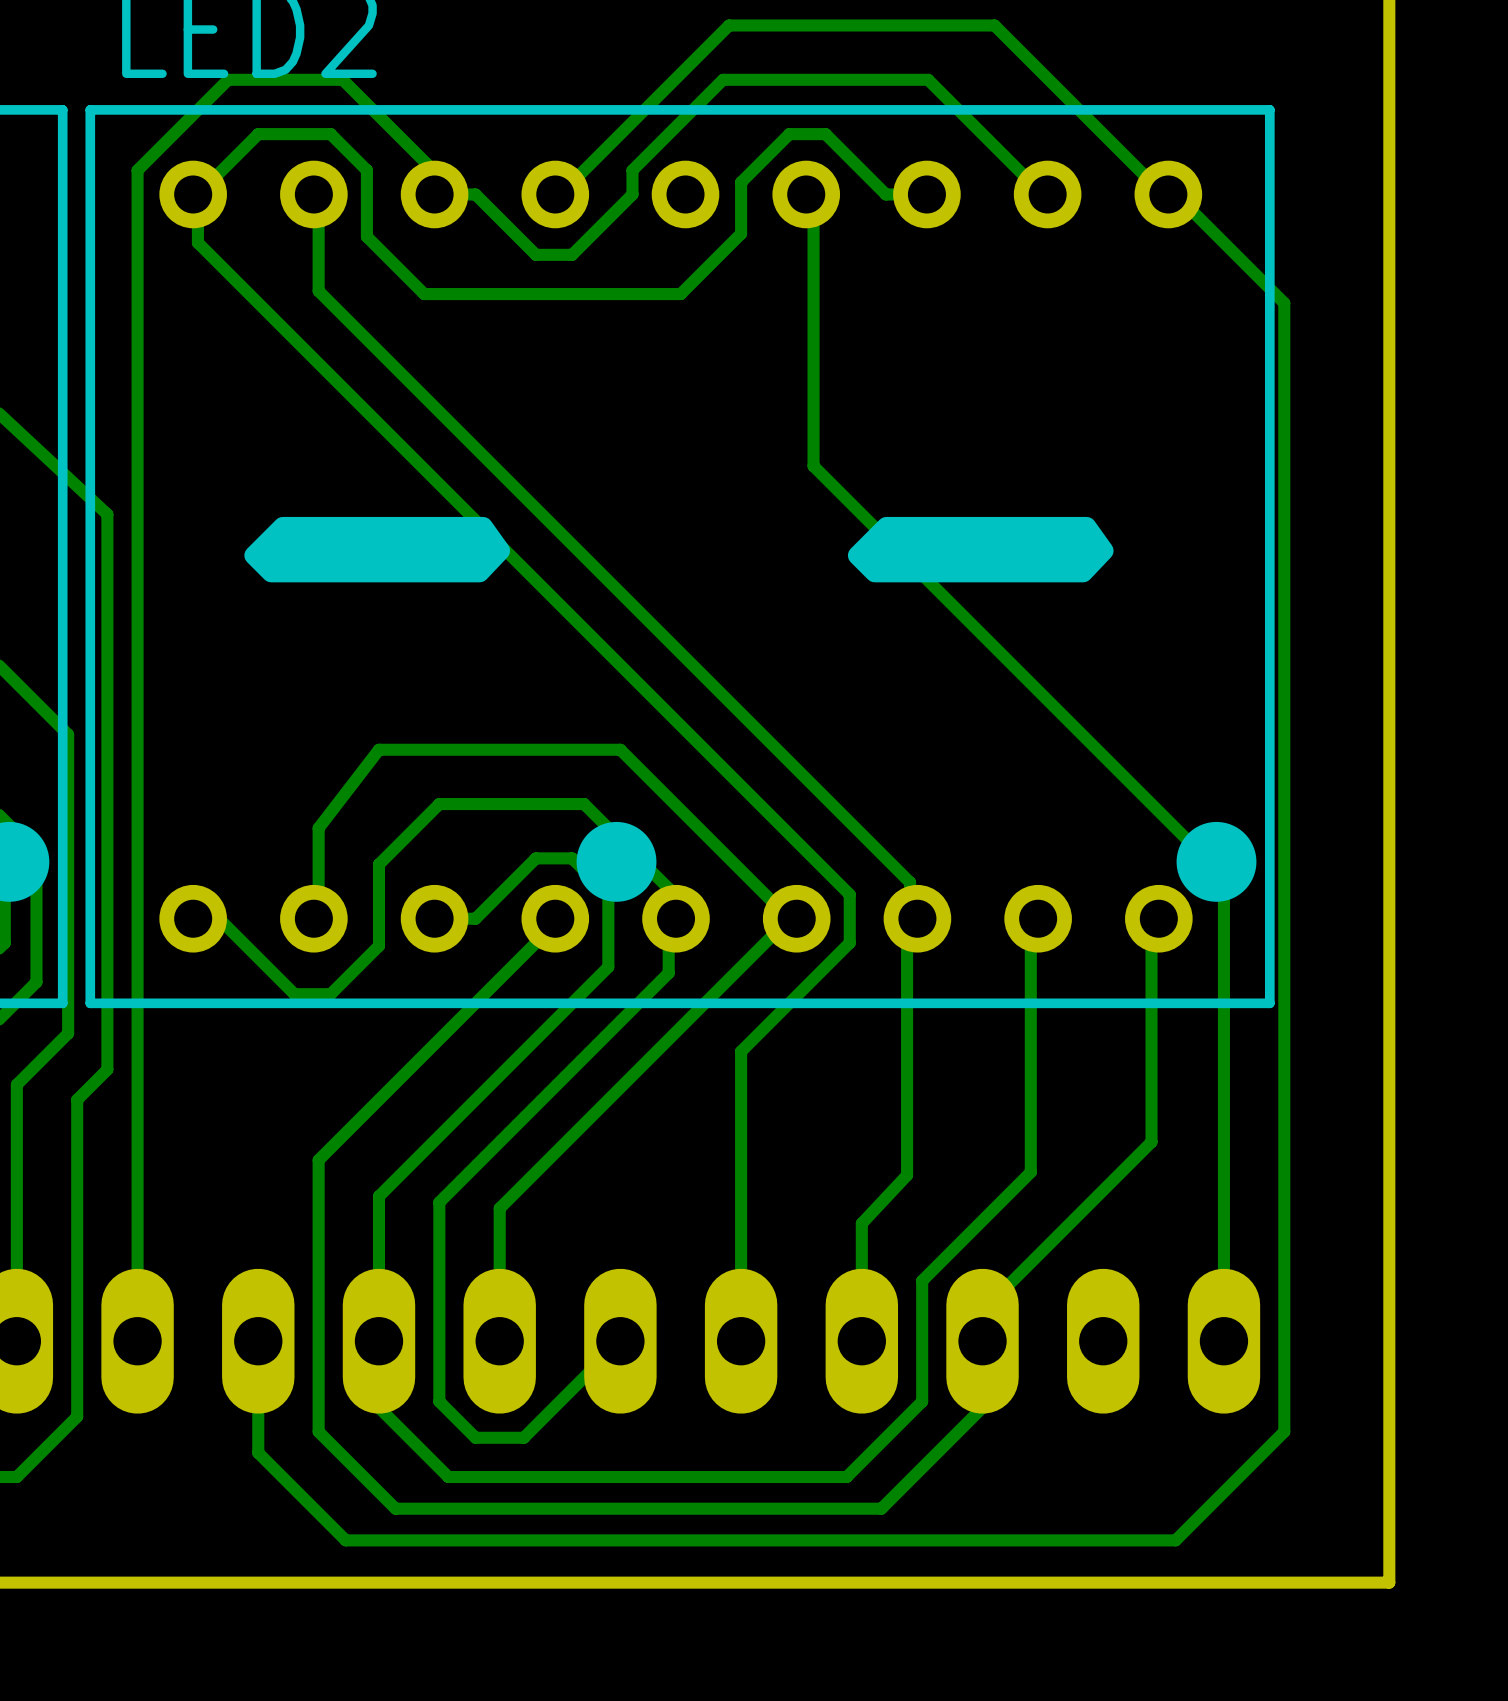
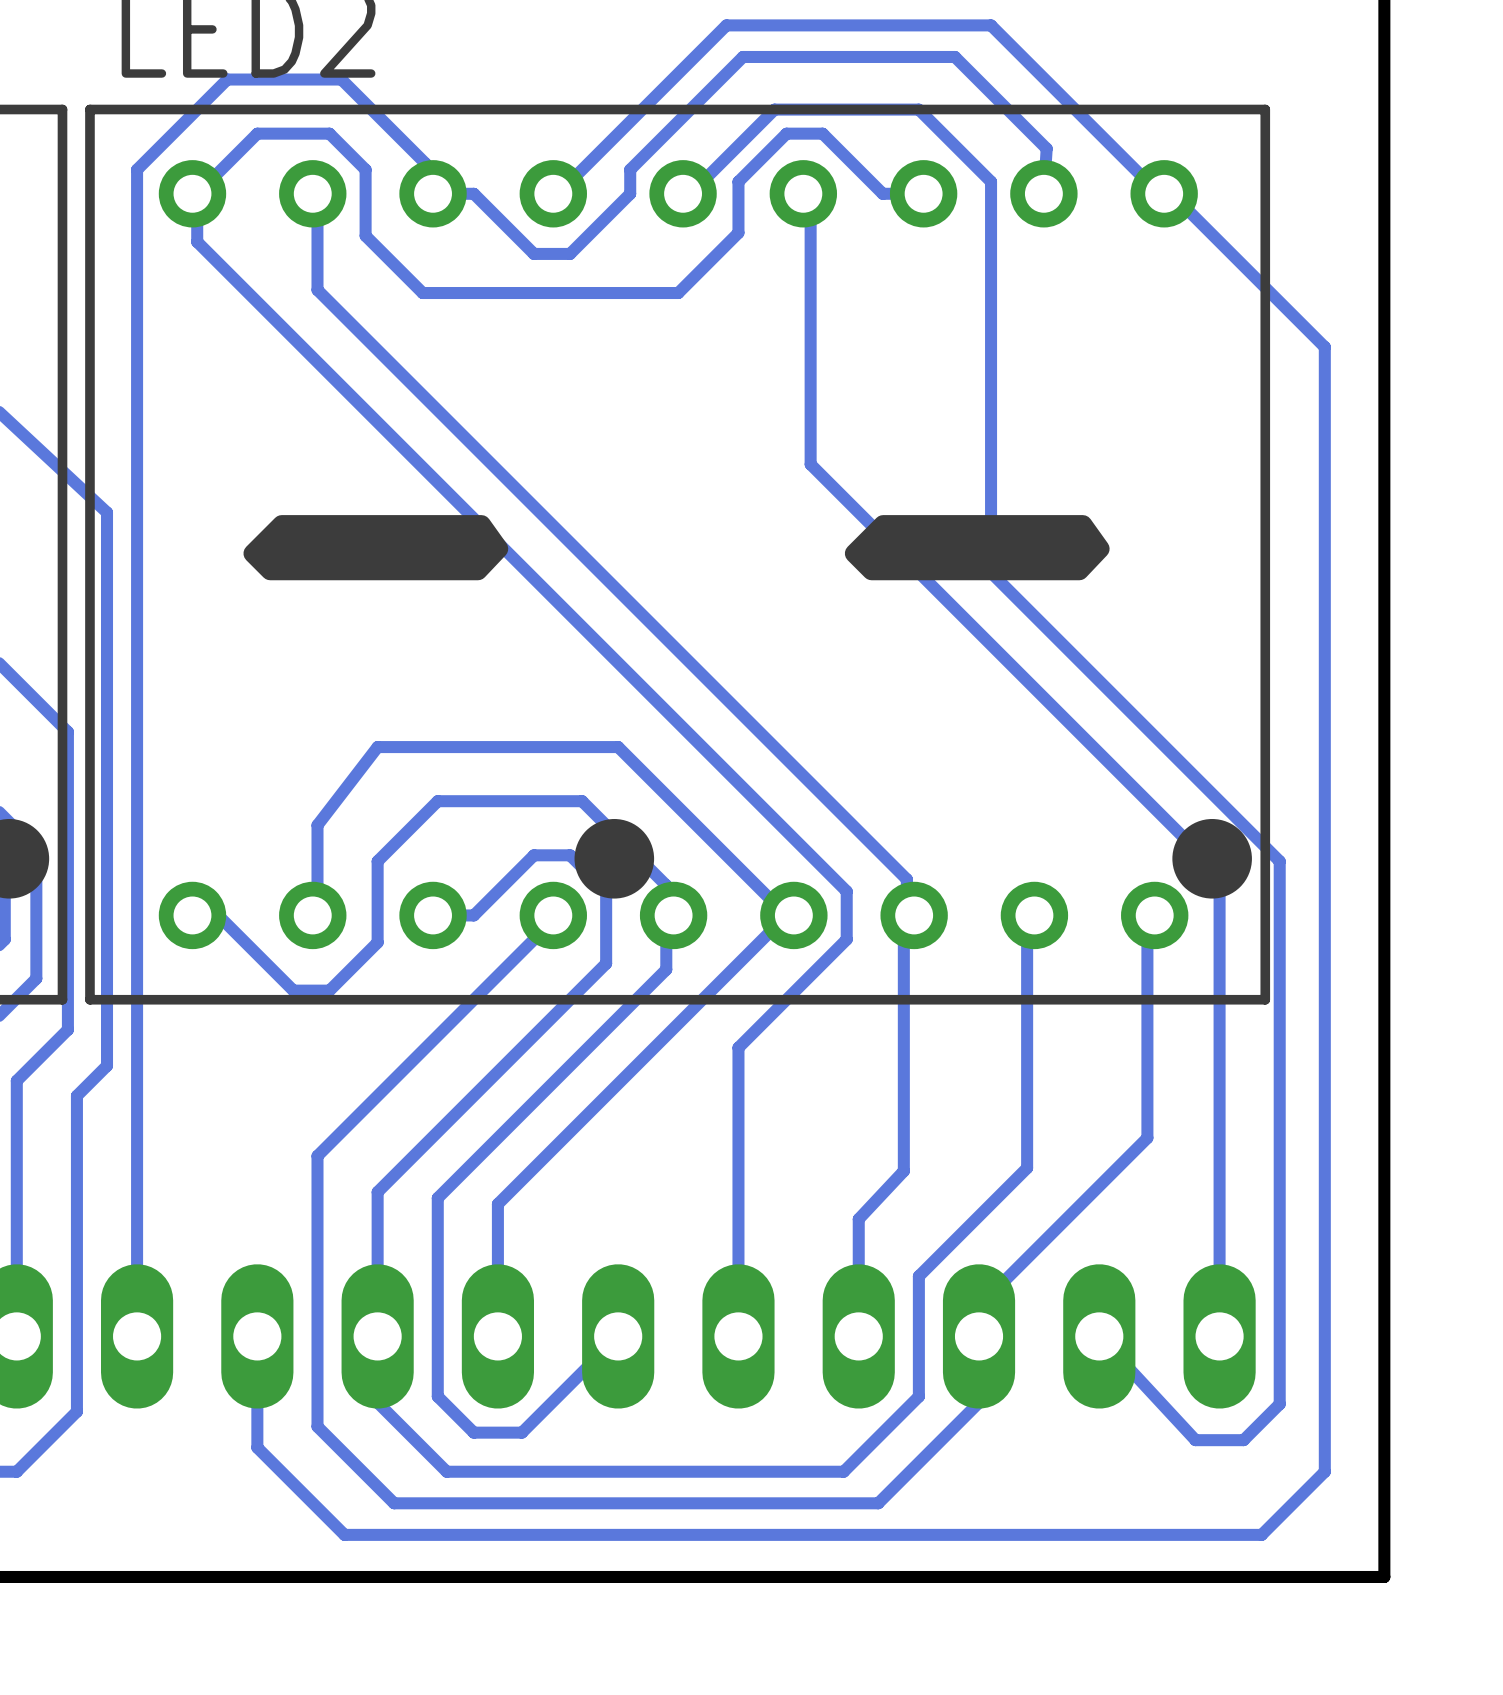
bottom track: (723, 79) (928, 79) (1042, 194) (1047, 194) -> (720, 79) (742, 56) (954, 56) (1046, 148) (1043, 193)
bottom track: (1284, 303) (1284, 864) -> (683, 193) (690, 193) (774, 109) (918, 109) (991, 181) (991, 572) (1279, 861)
bottom track: none -> (1279, 302) (1324, 347) (1324, 1471) (1261, 1534) (1171, 1534)
bottom track: (1284, 1409) (1284, 1431) (1175, 1540) -> (1279, 1404) (1243, 1440) (1195, 1440) (1099, 1336)

